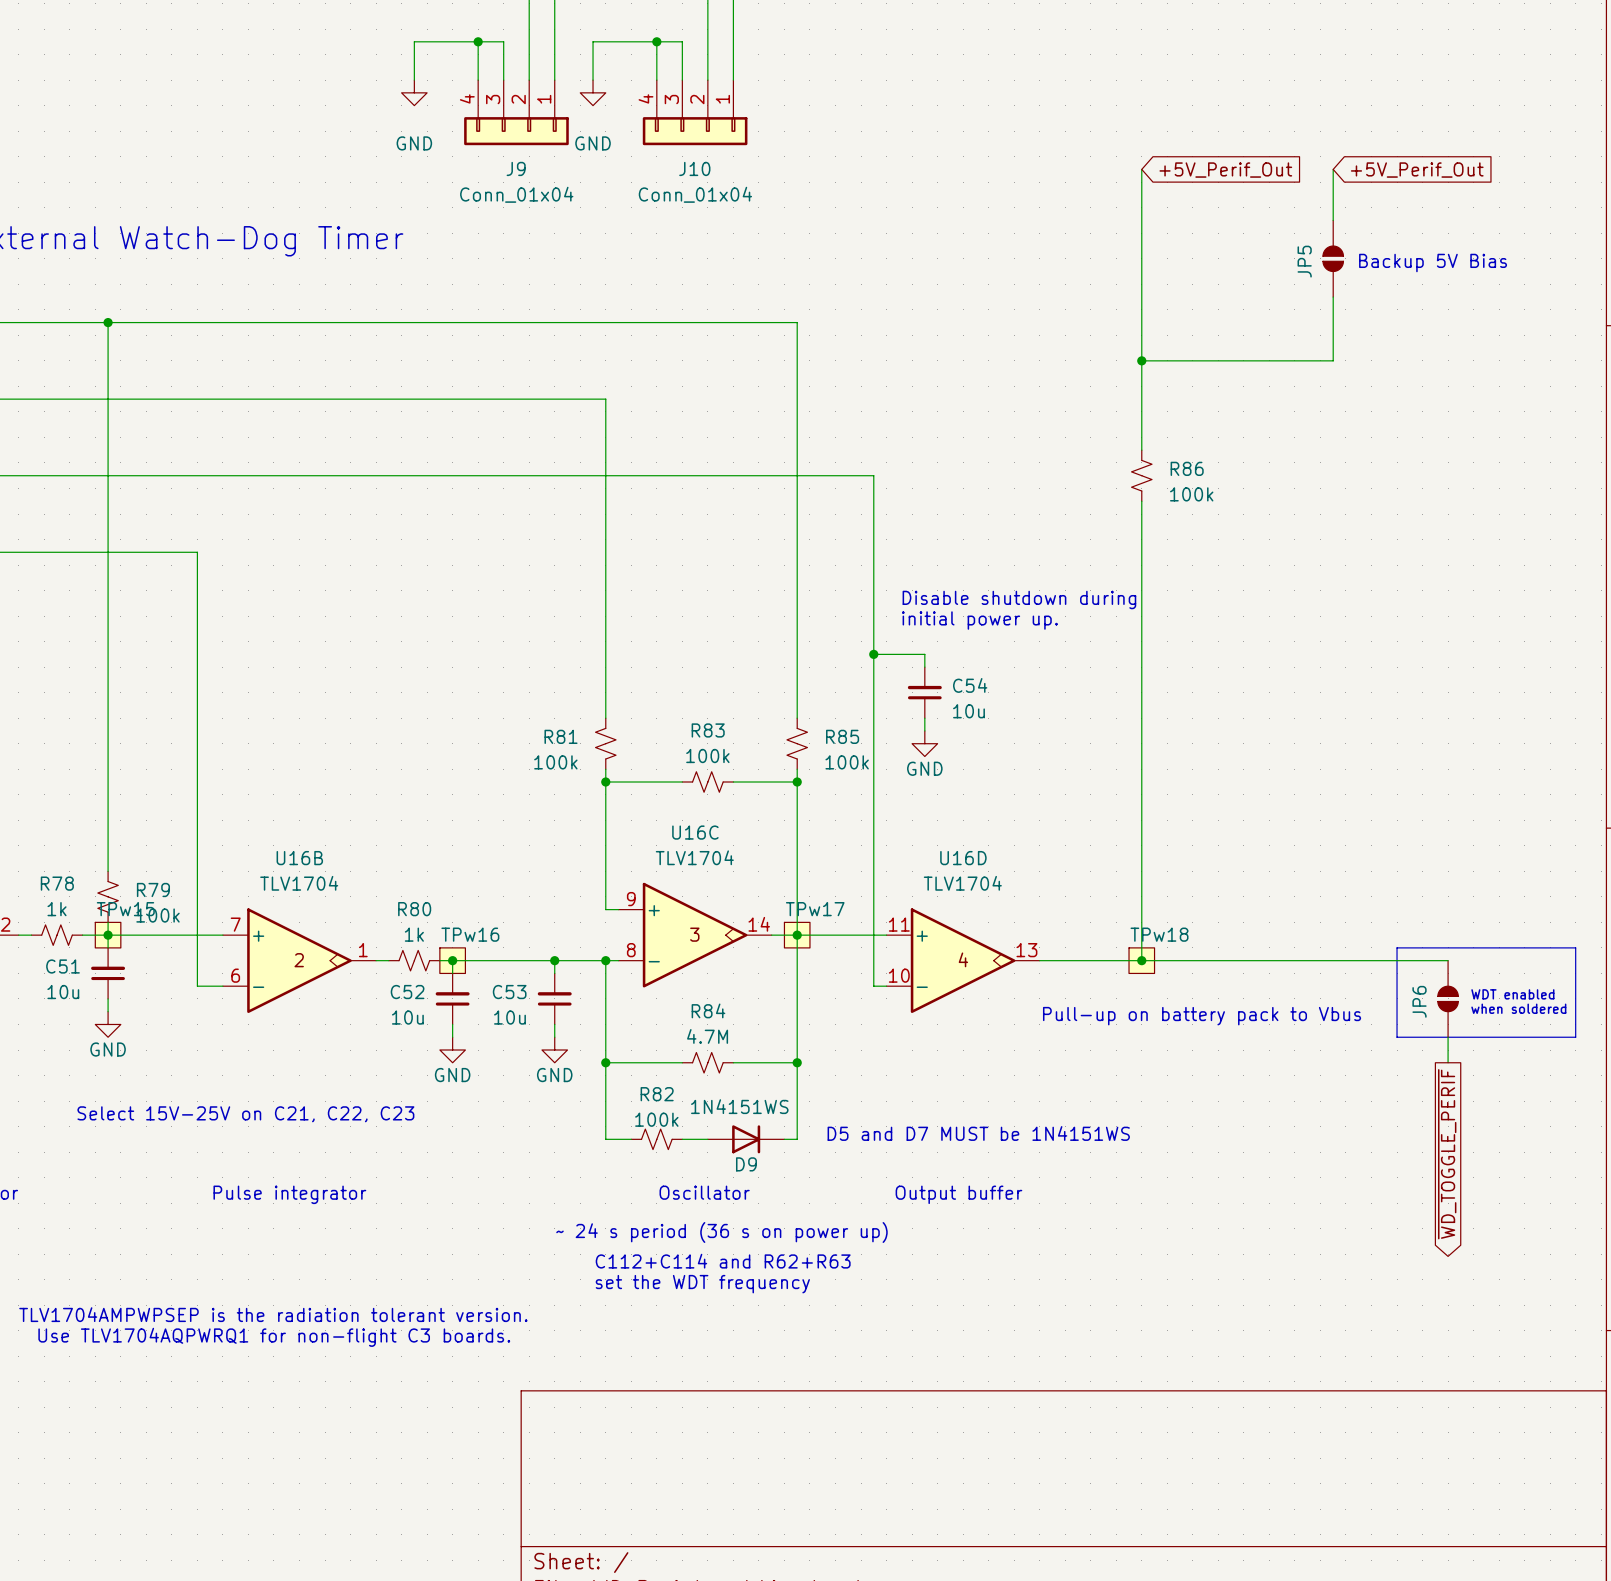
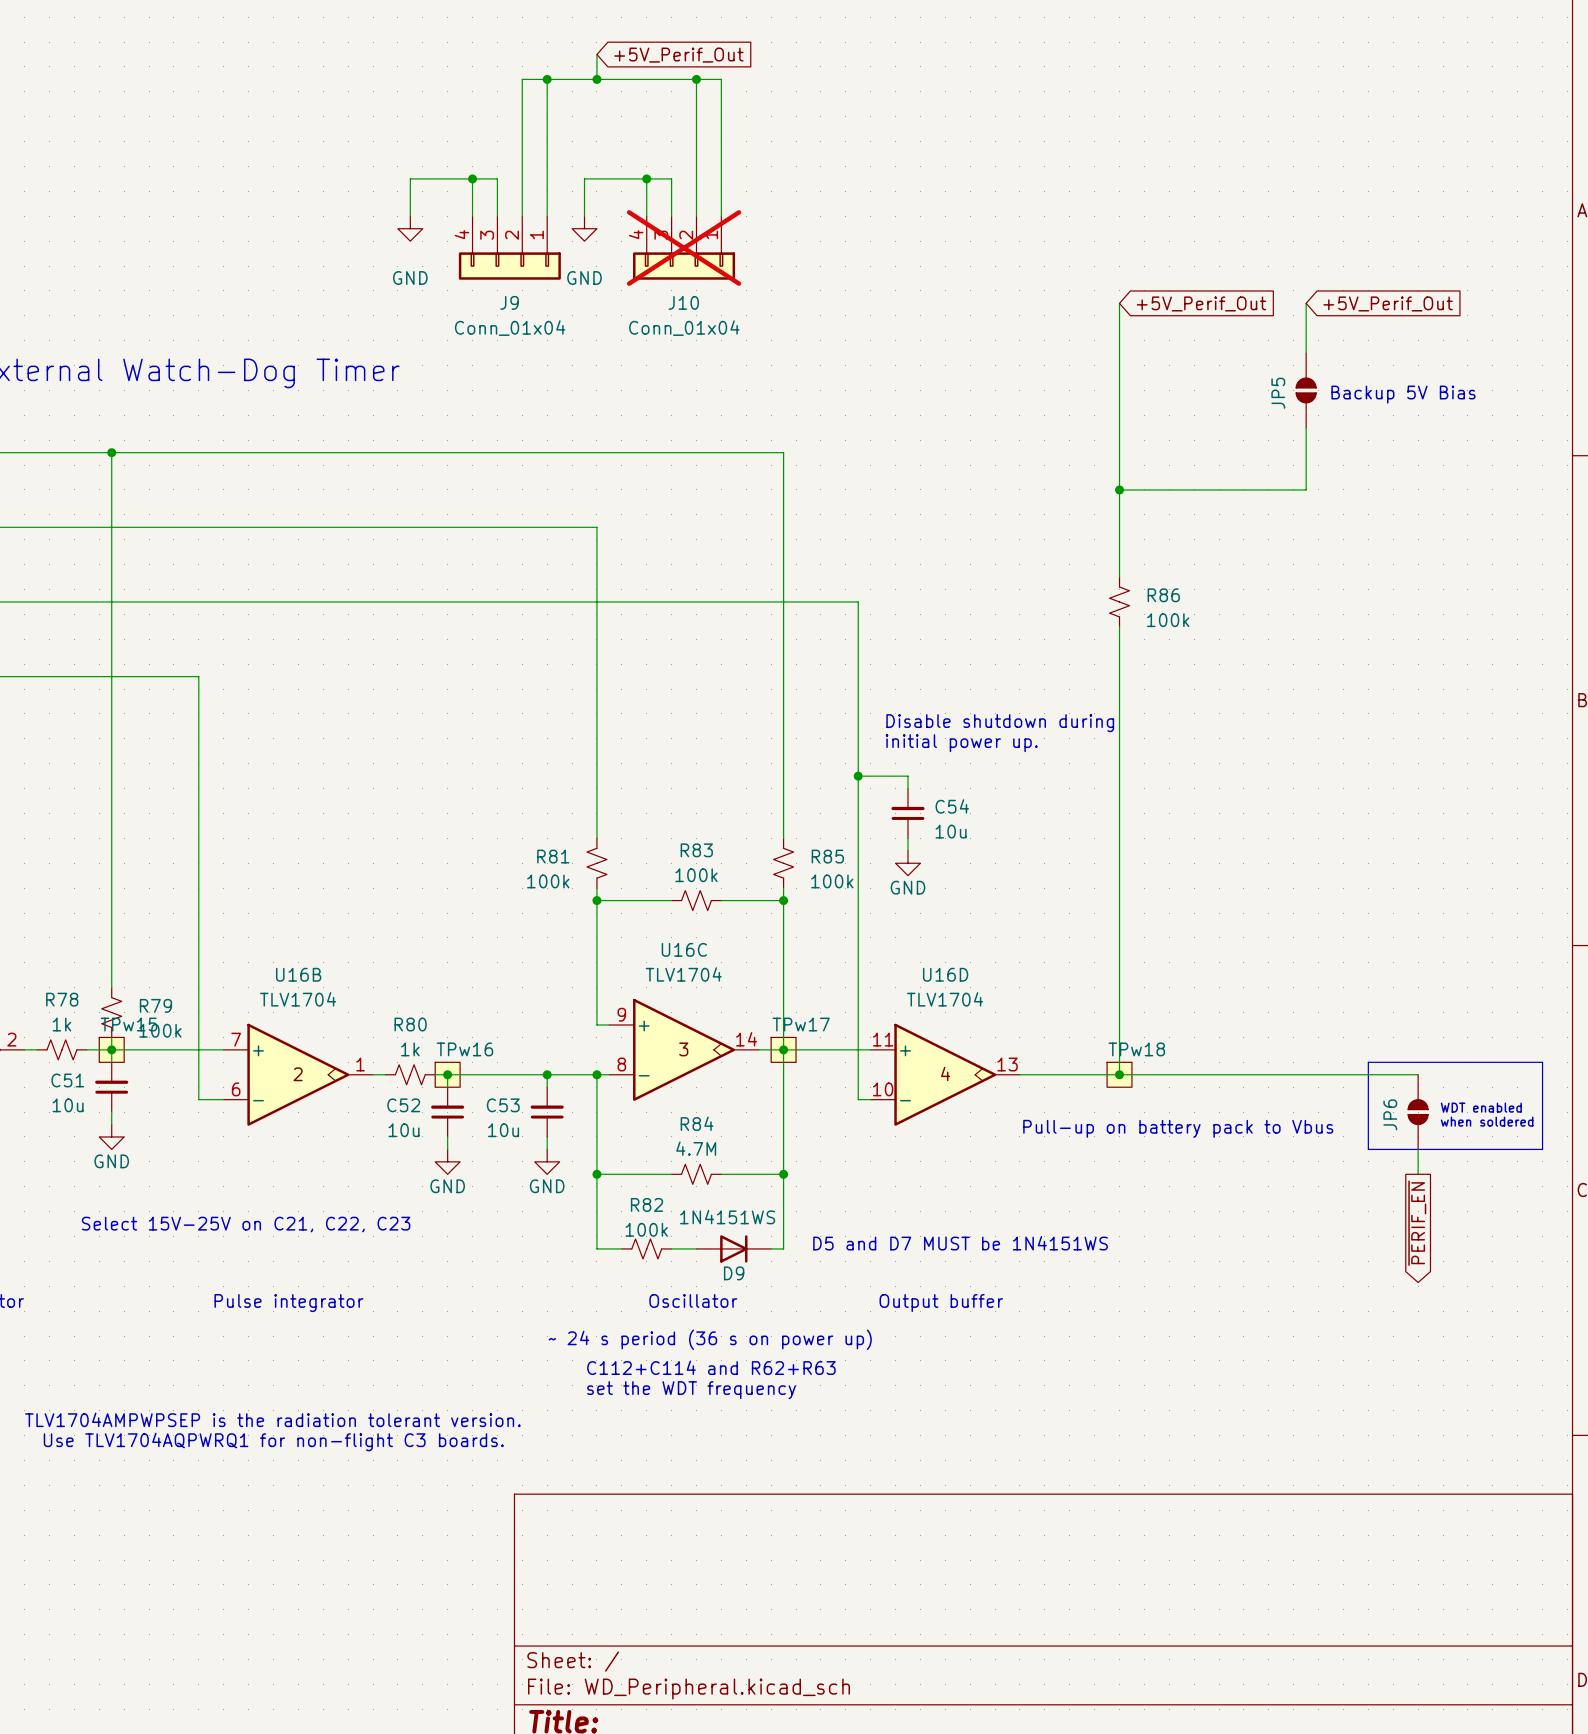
J10 do-not-place cross: none -> (684, 248)
global label: ~{WD_TOGGLE_PERIF} (1447, 1154) -> ~{PERIF_EN} (1417, 1223)

